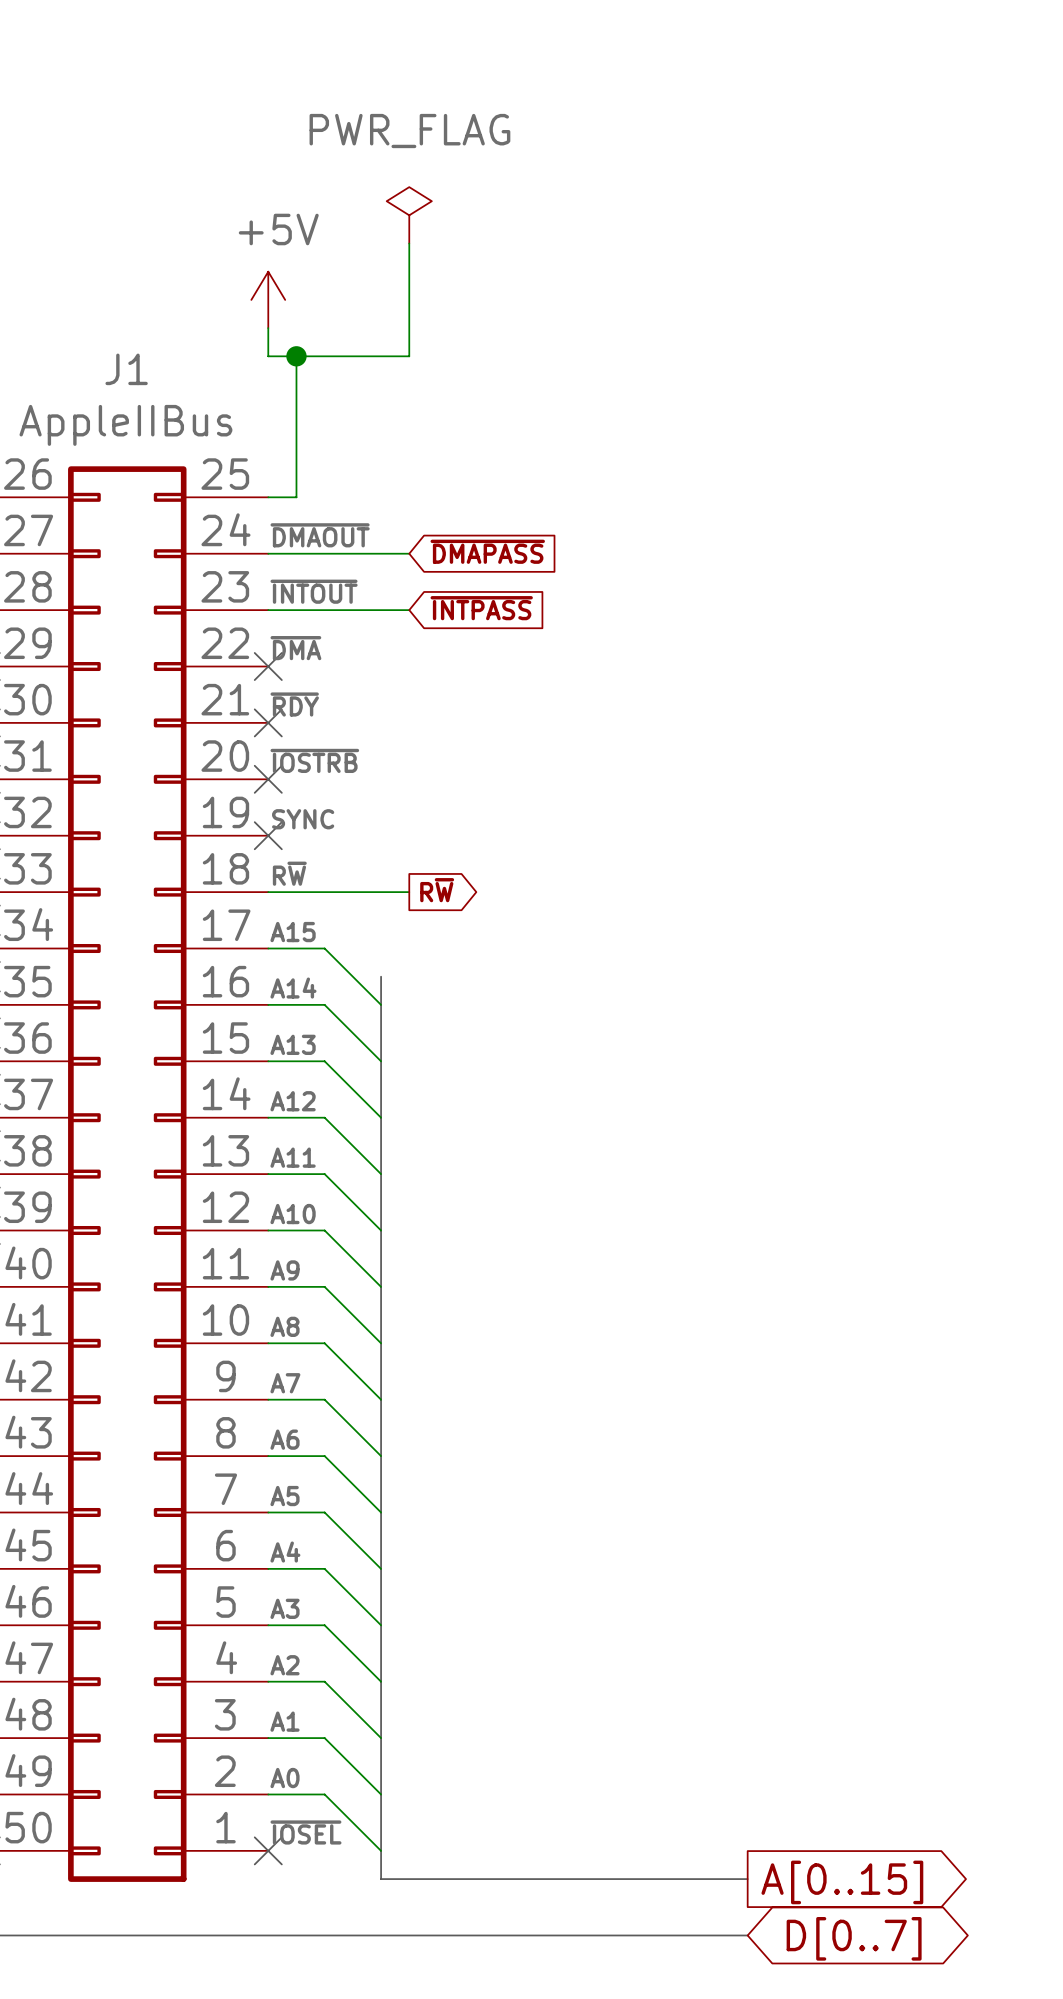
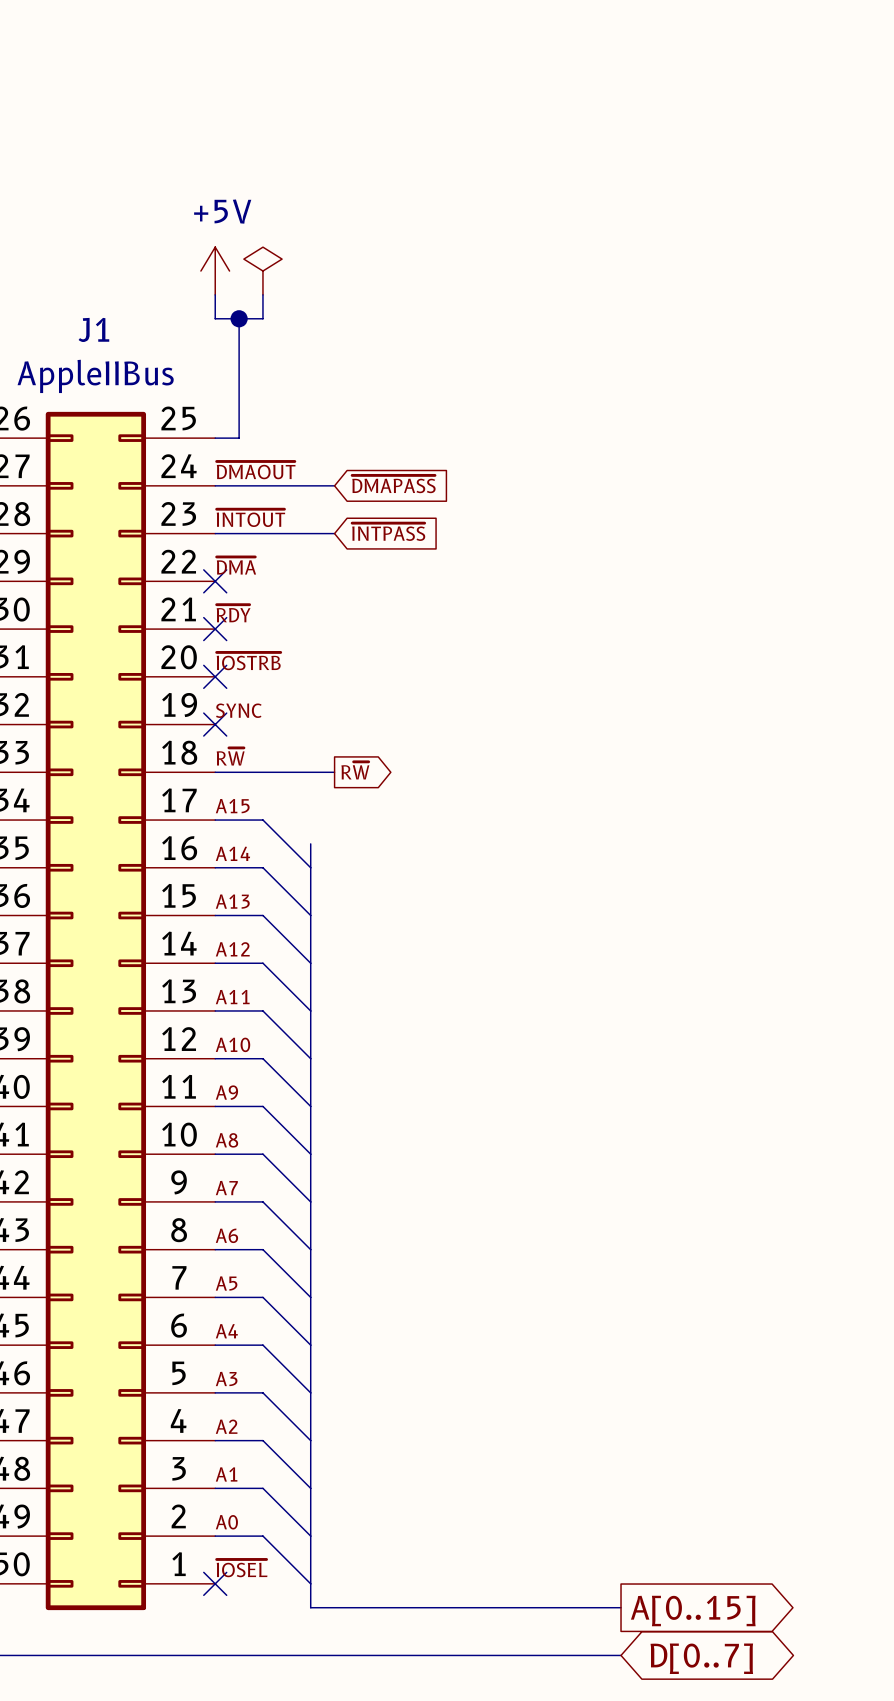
power symbol: PWR_FLAG (409, 215) -> none
wire: (409, 243) (409, 356) (324, 356) -> (262, 294) (262, 318)
power symbol: none -> (262, 271)

